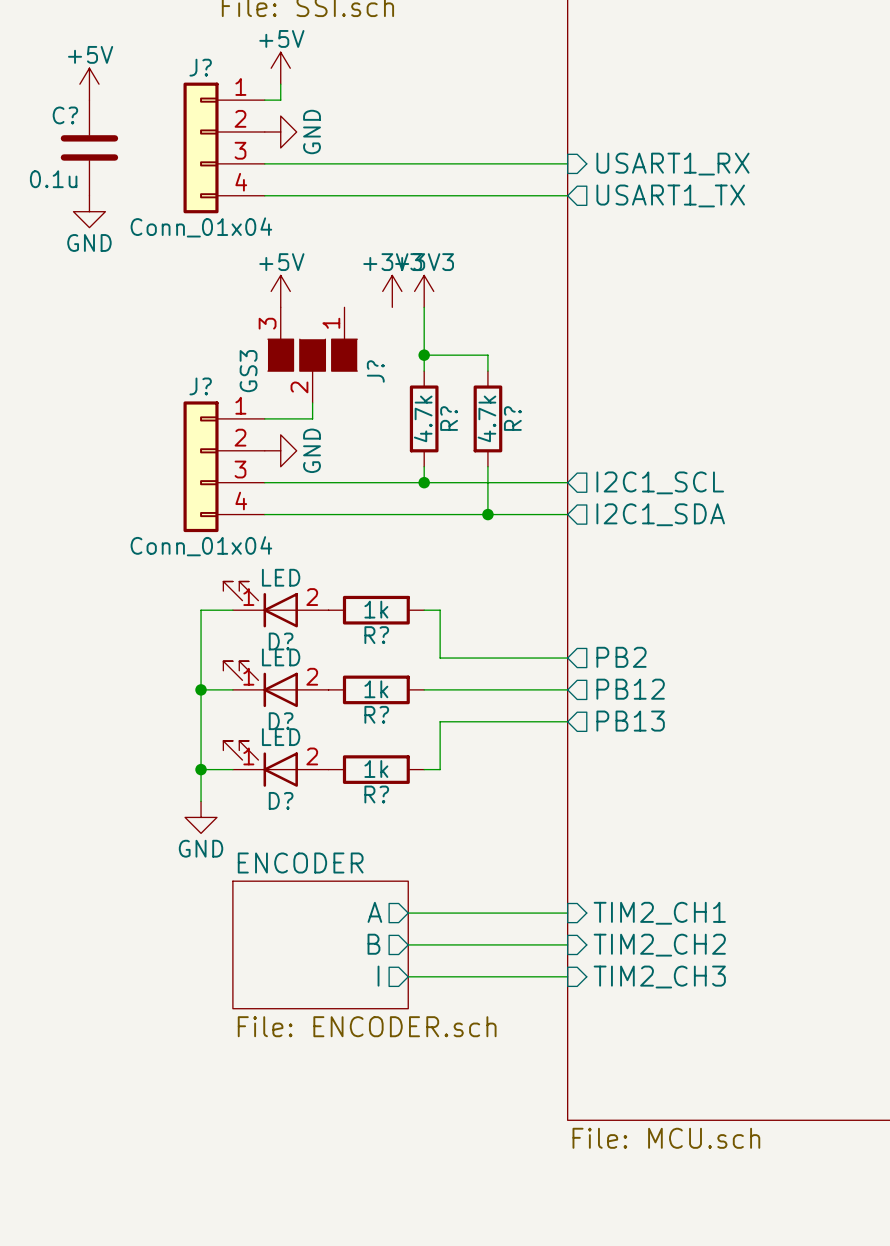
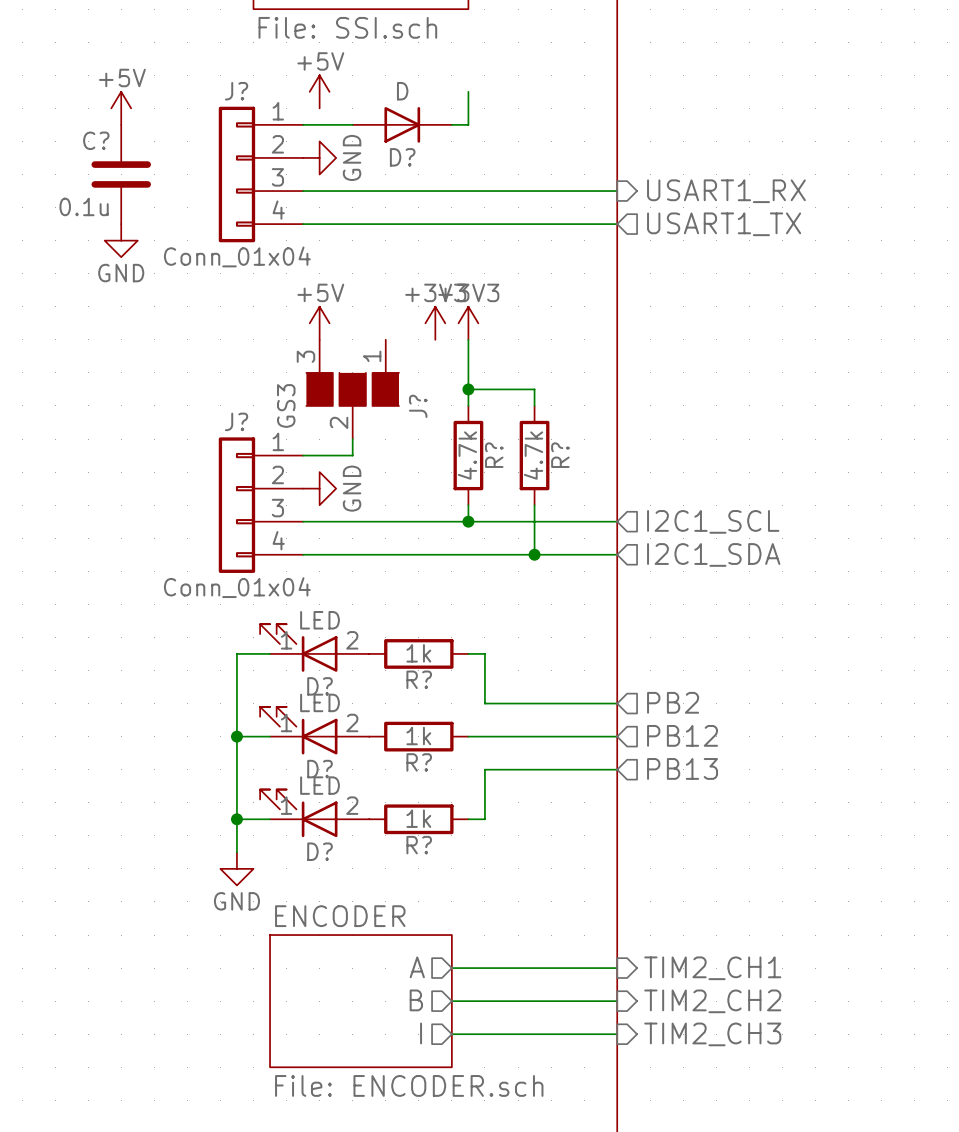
wire: none -> (468, 91) (468, 124) (451, 124)
wire: (280, 84) (280, 100) -> (352, 124) (319, 124)
D?: none -> D (402, 124)

